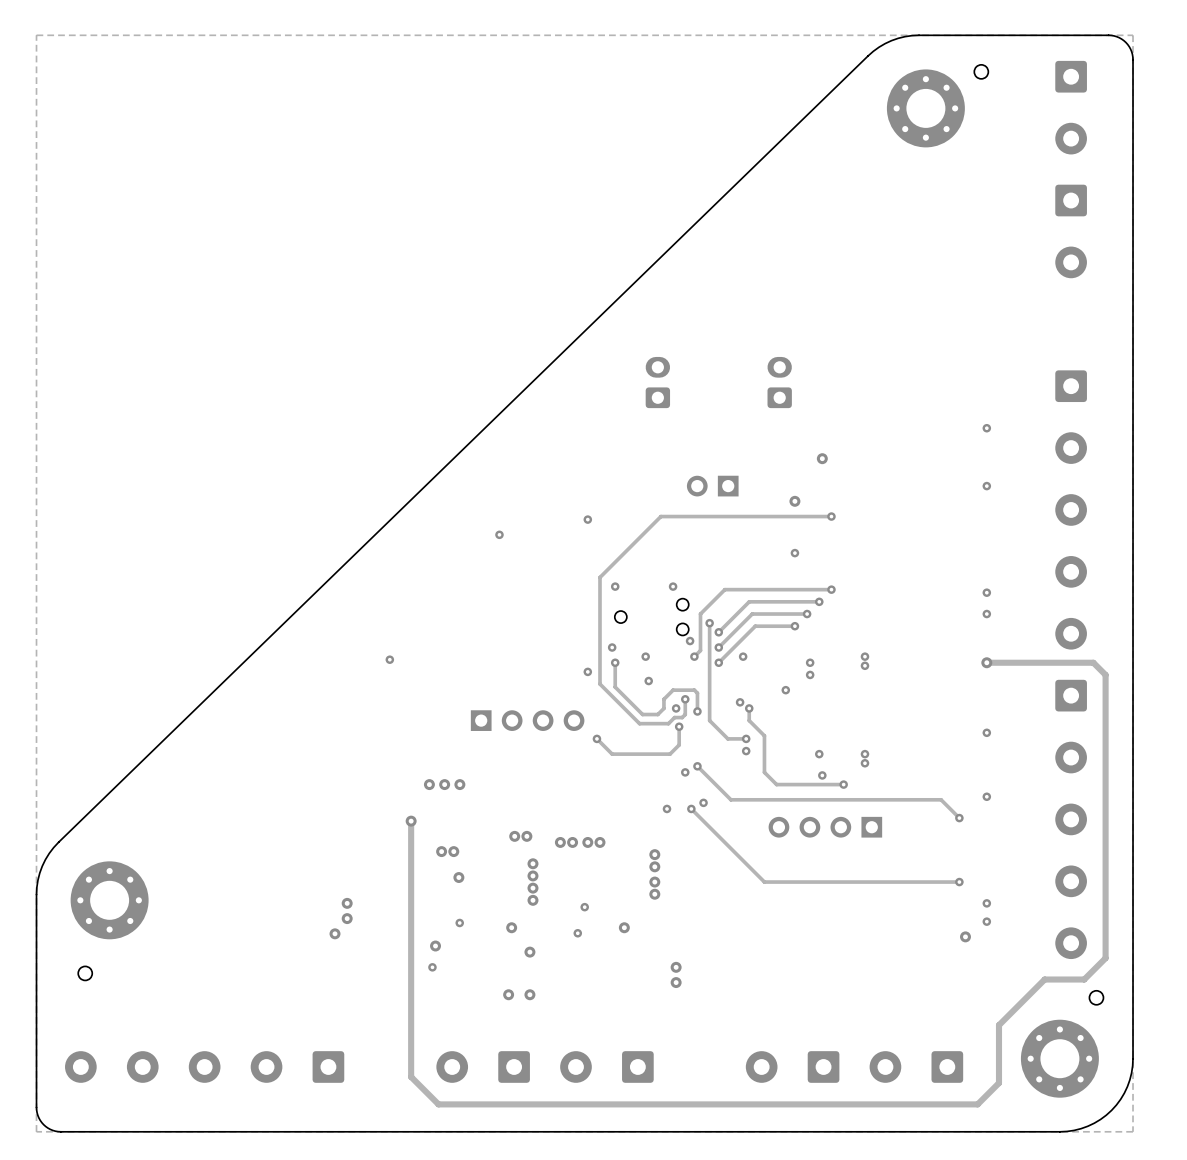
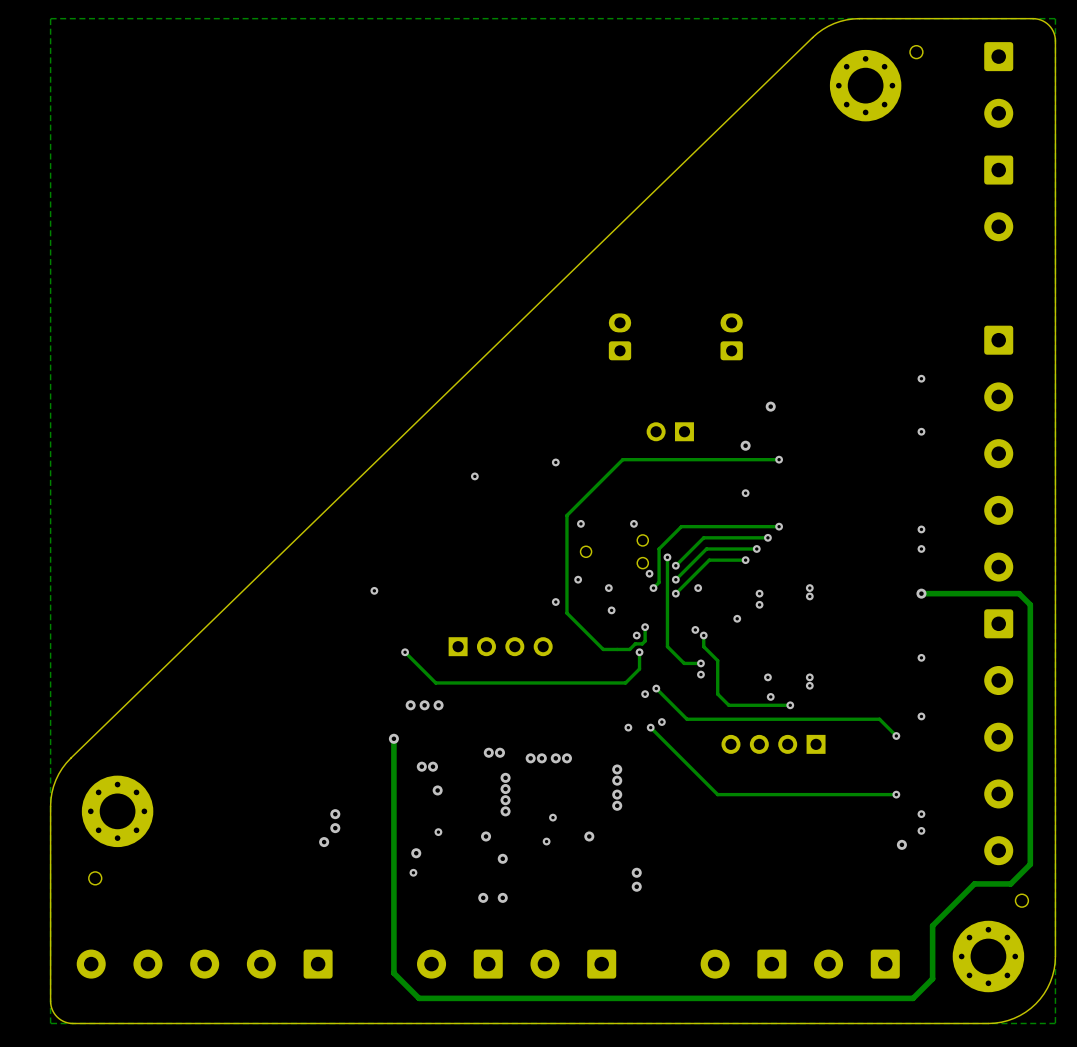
track: (615, 662) (615, 687) (642, 714) (657, 714) (663, 708) (663, 699) (673, 690) (694, 690) (697, 693) (697, 711) -> none
via: (615, 662) -> none
via: (697, 711) -> none
via: none -> (405, 652)
track: (596, 738) (612, 754) (670, 754) -> (405, 652) (435, 682) (625, 682) (631, 677)
via: (596, 738) -> none

